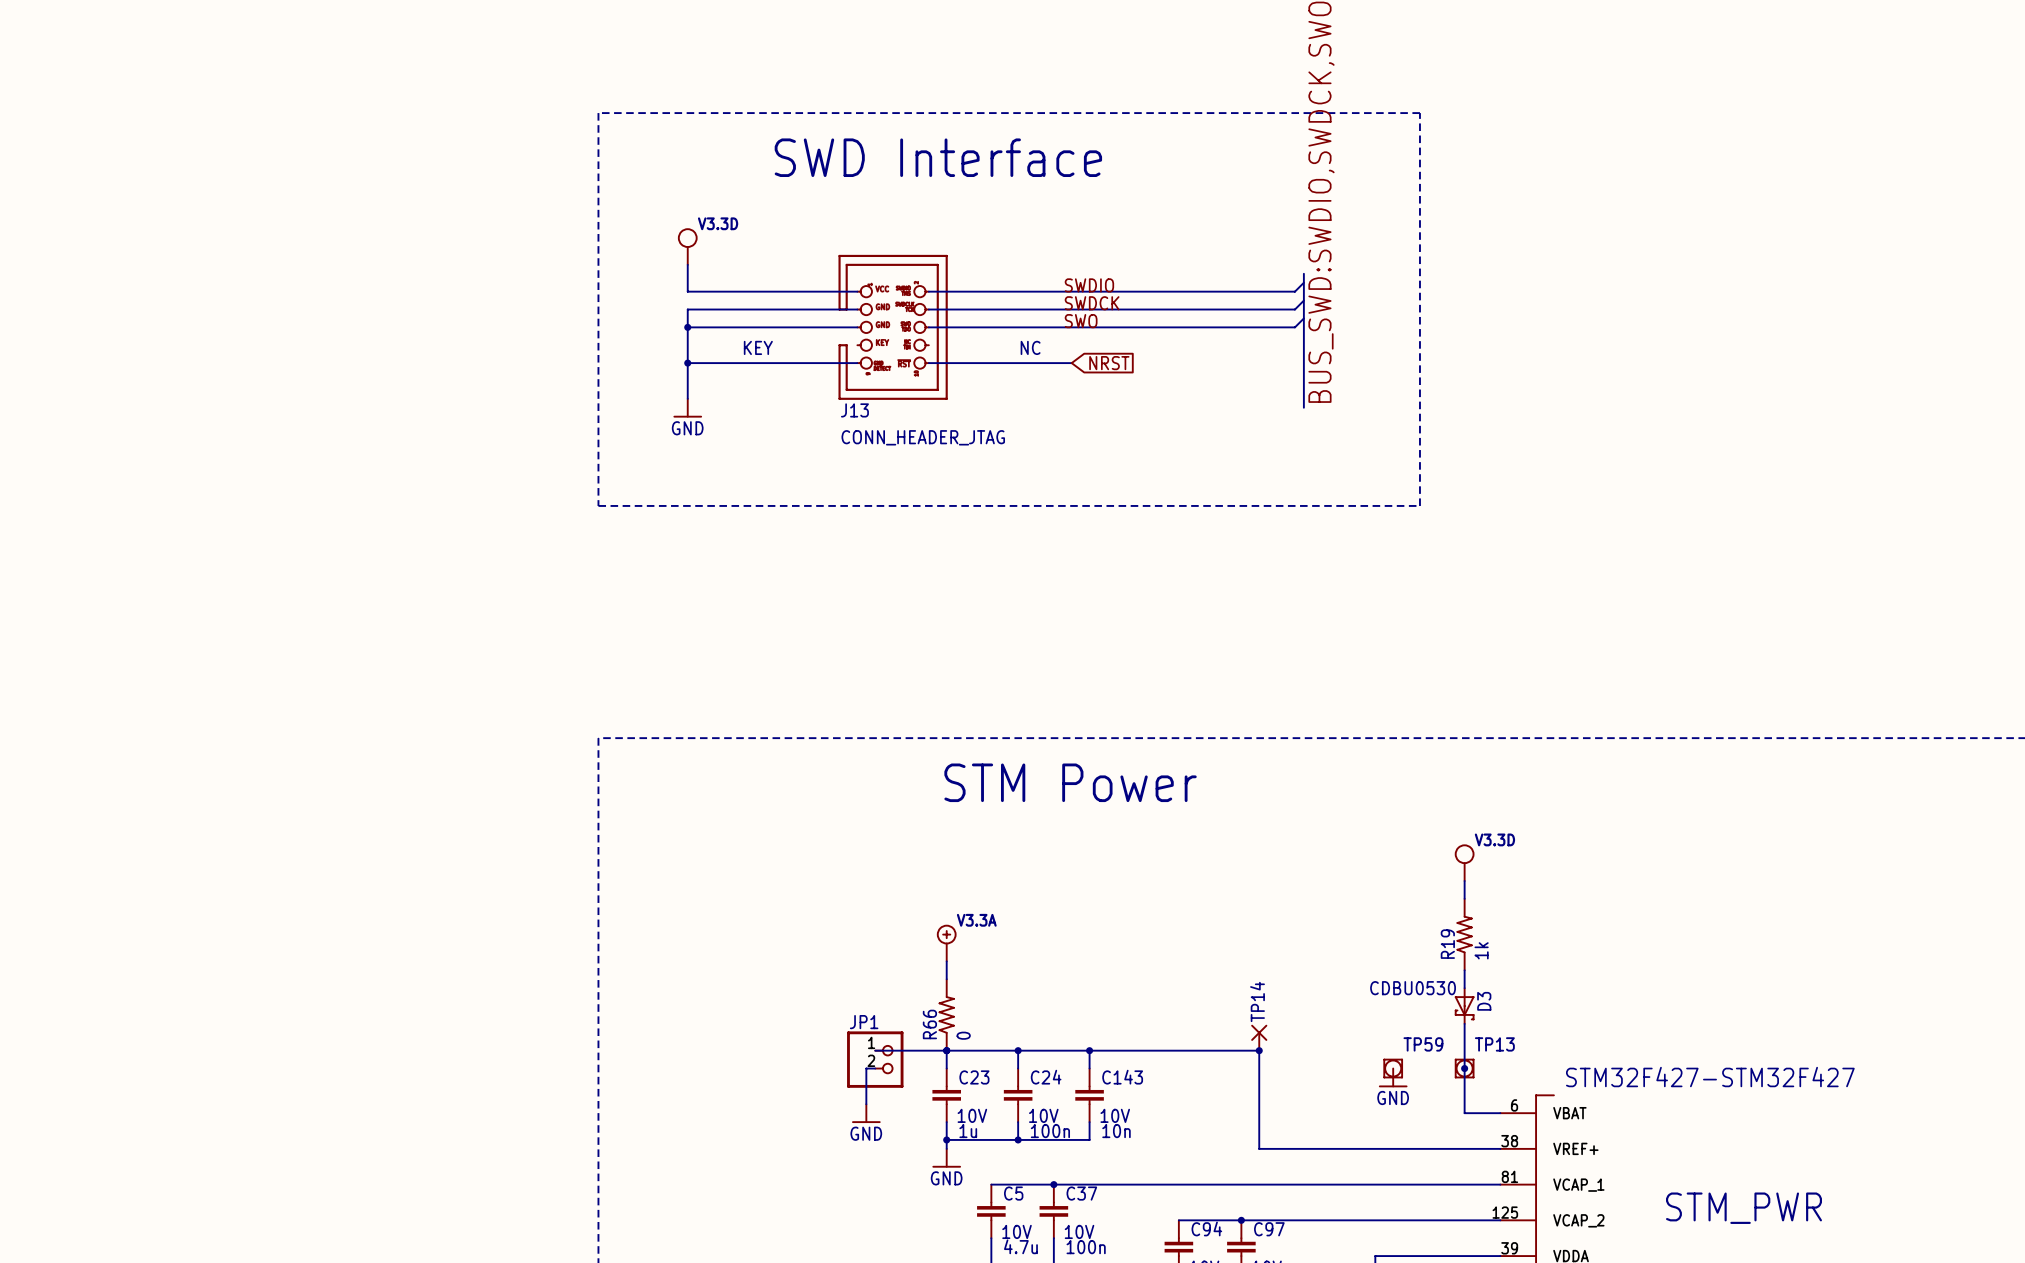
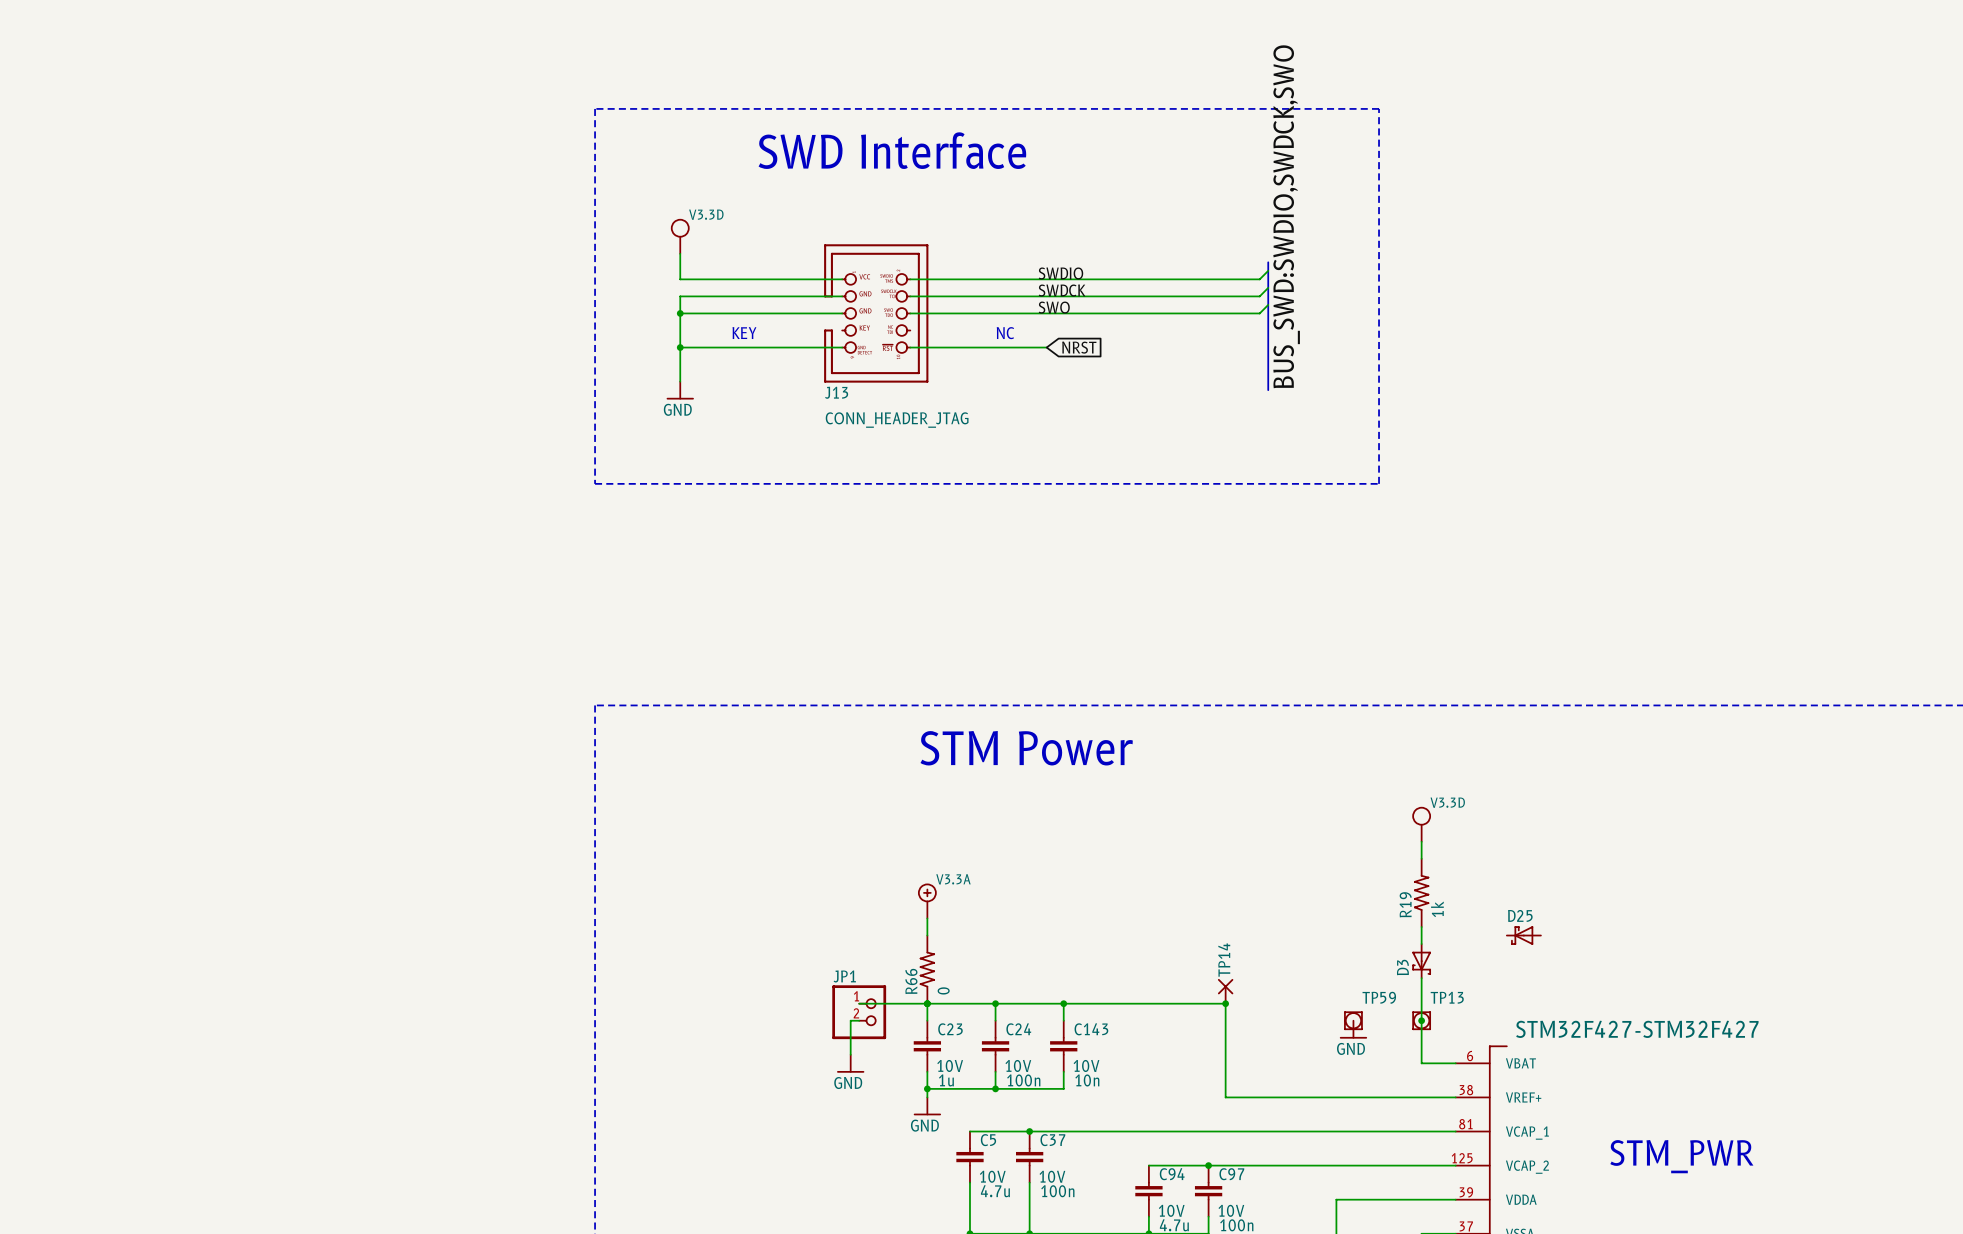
D25: none -> (1523, 935)
D3 value: CDBU0530 (1413, 988) -> none
D3 name position: D3 (1484, 1001) -> D3 (1402, 967)

